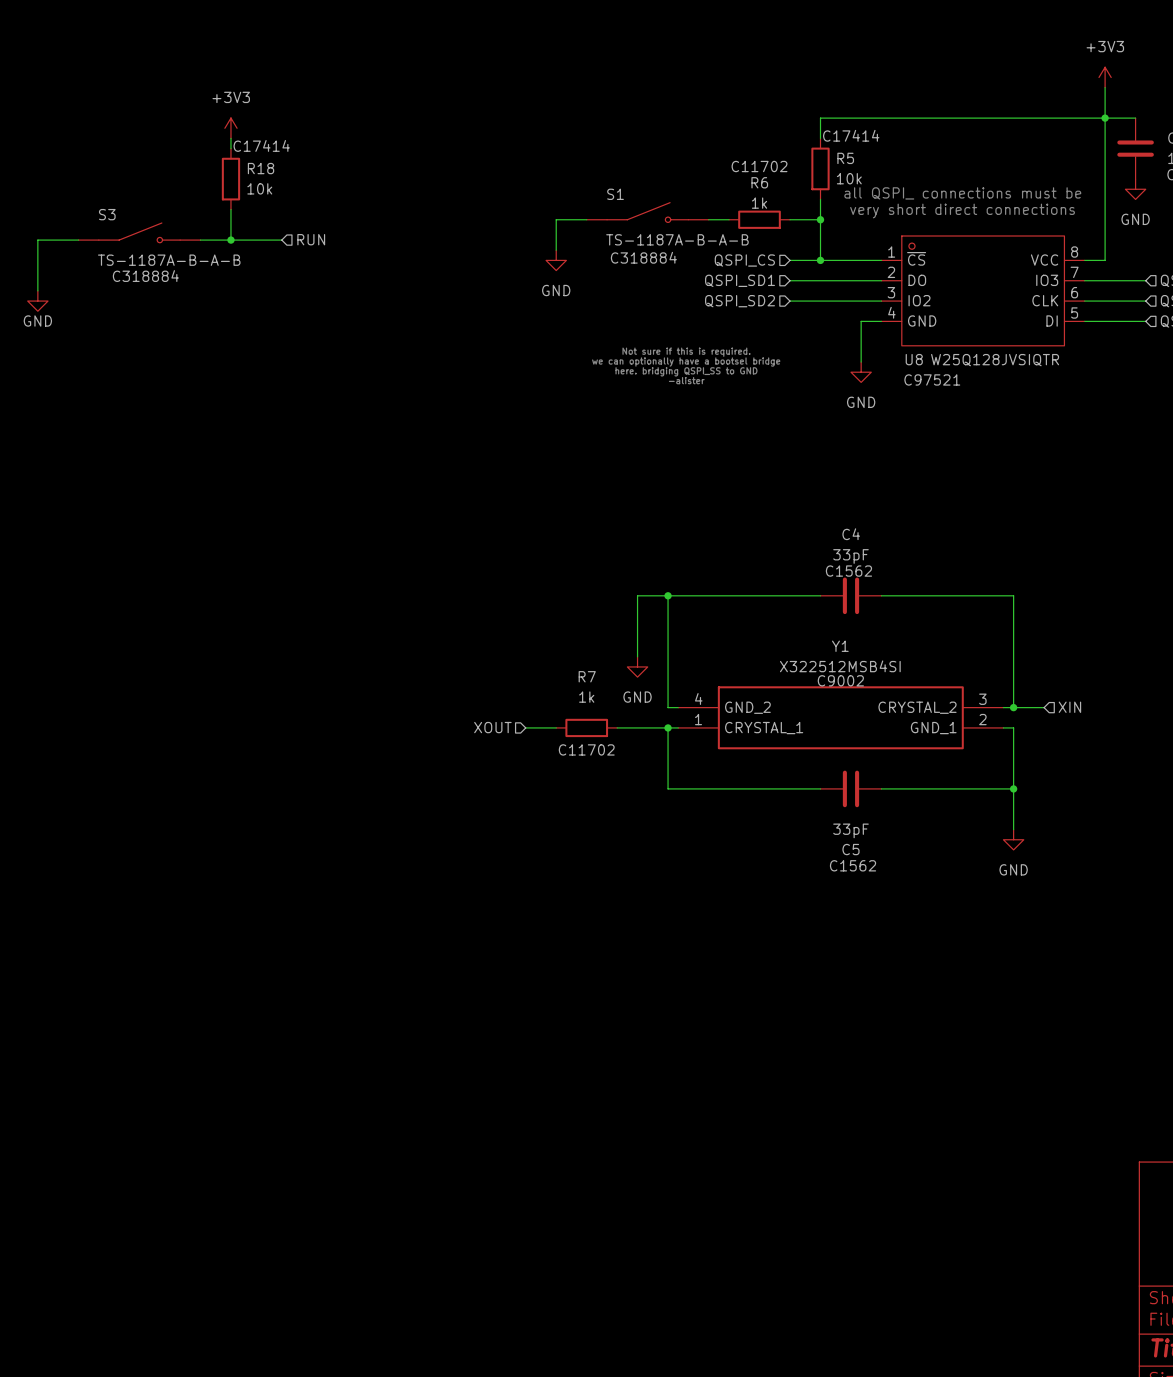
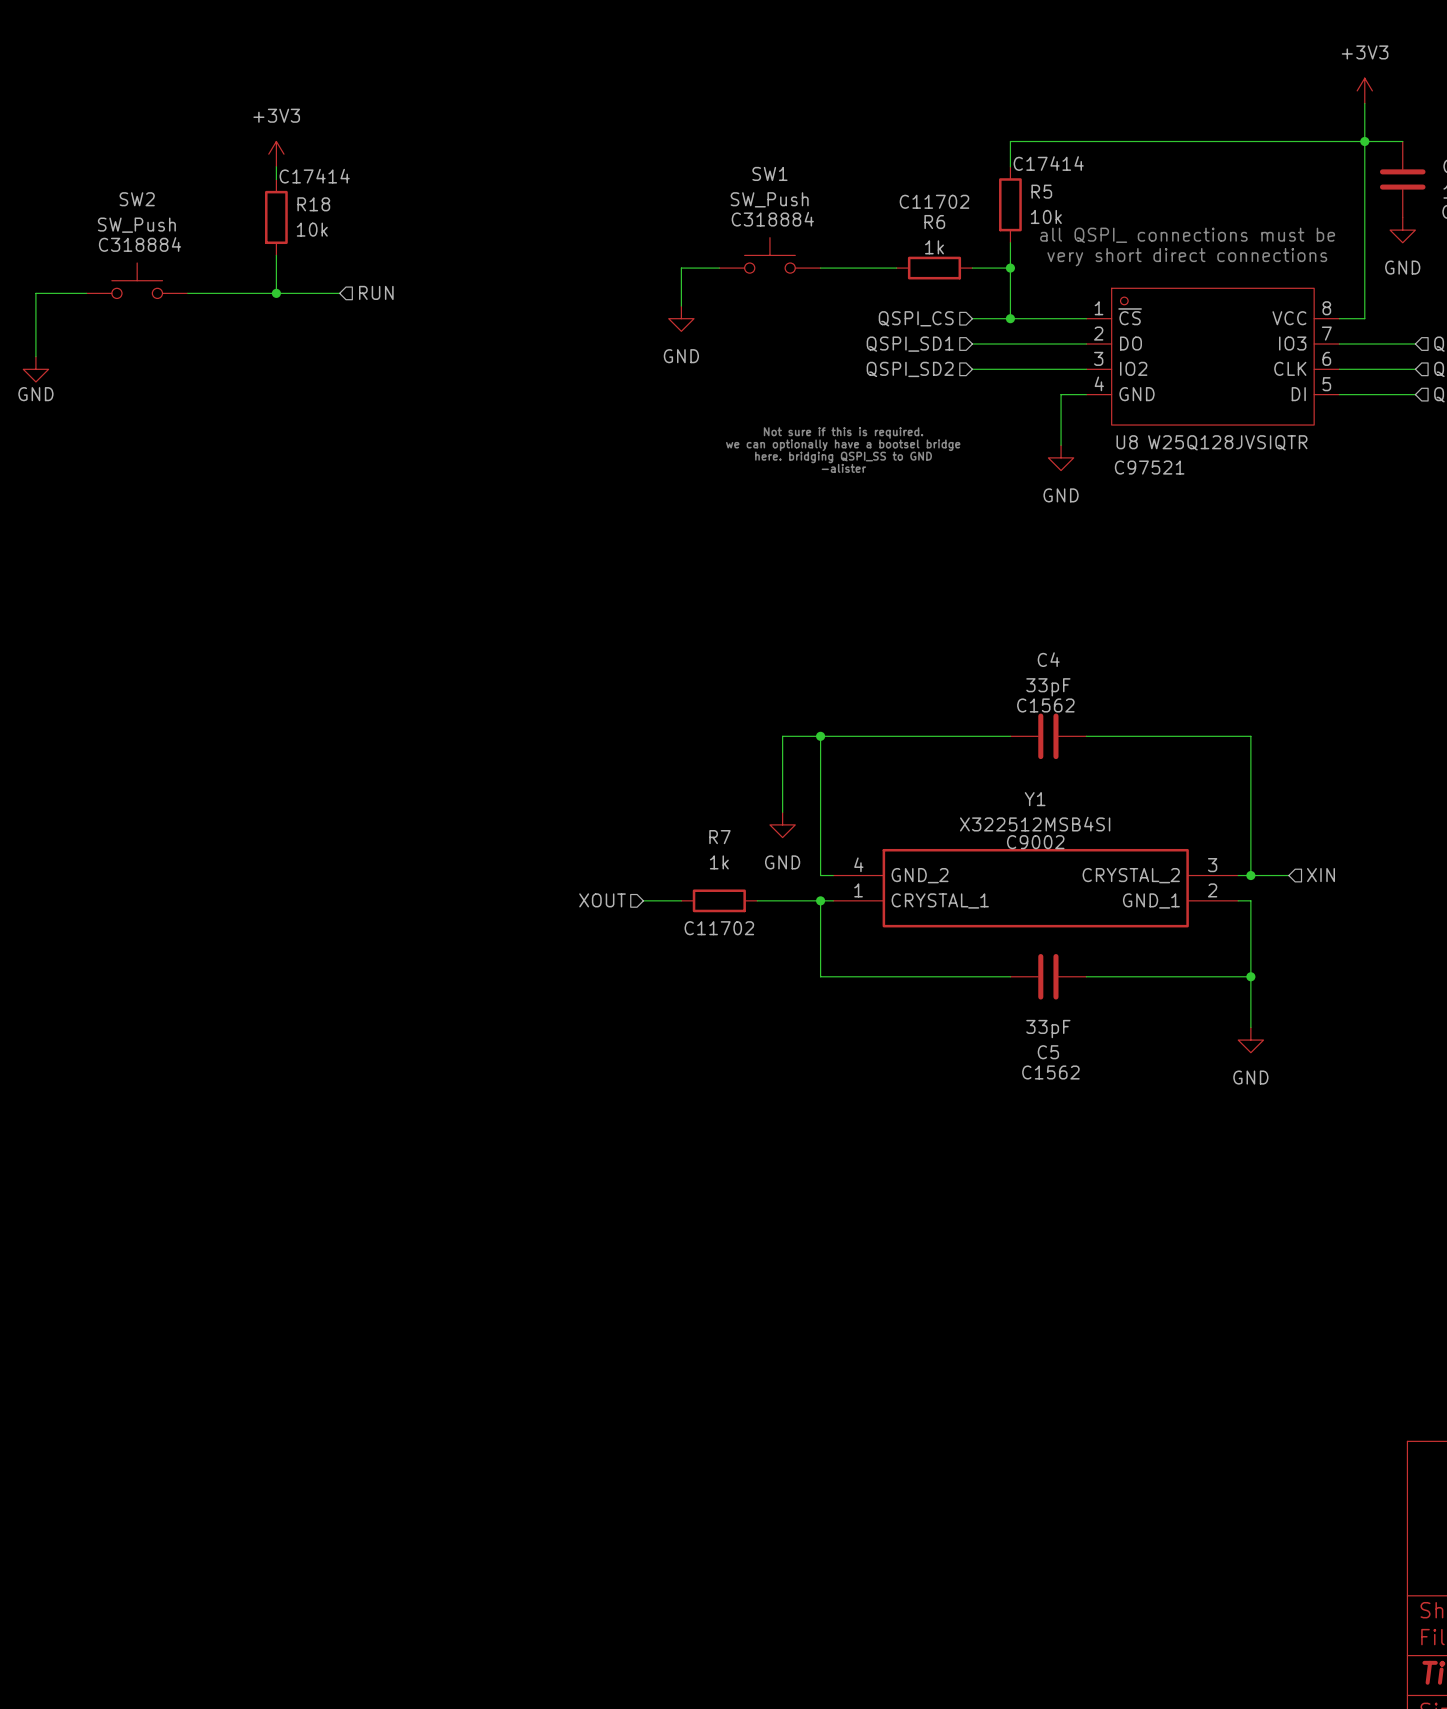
SW1: none -> SW_Push (769, 255)
S1: TS-1187A-B-A-B (647, 212) -> none
SW2: none -> SW_Push (137, 280)
S3: TS-1187A-B-A-B (139, 232) -> none

